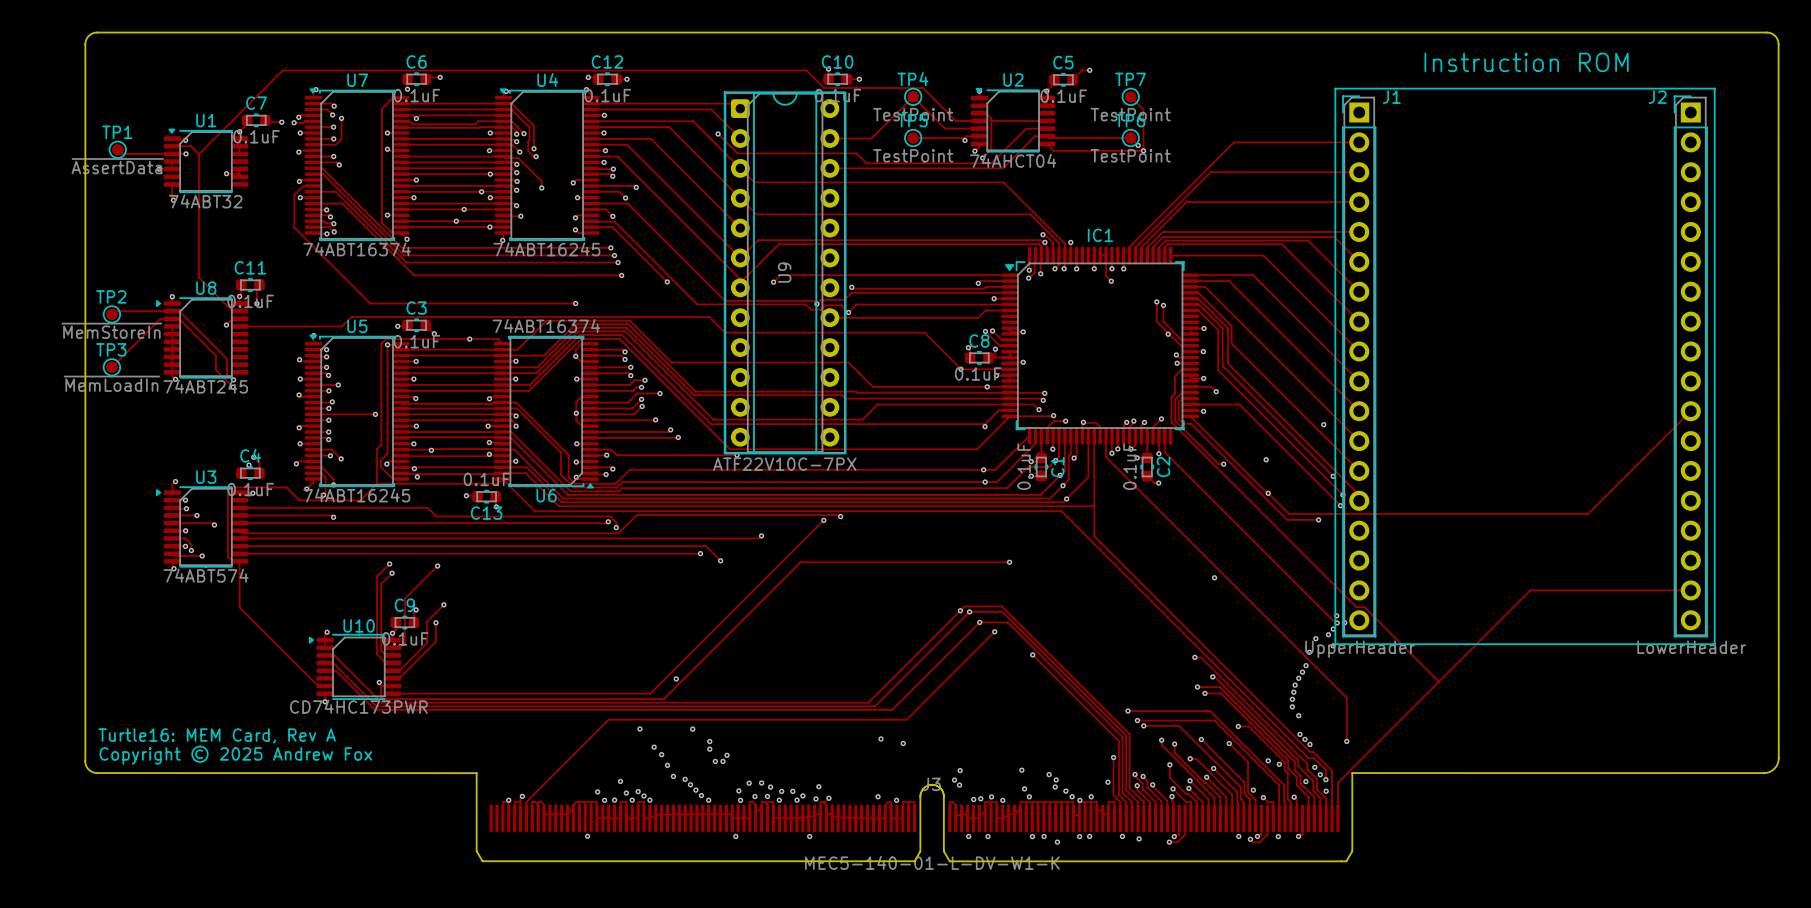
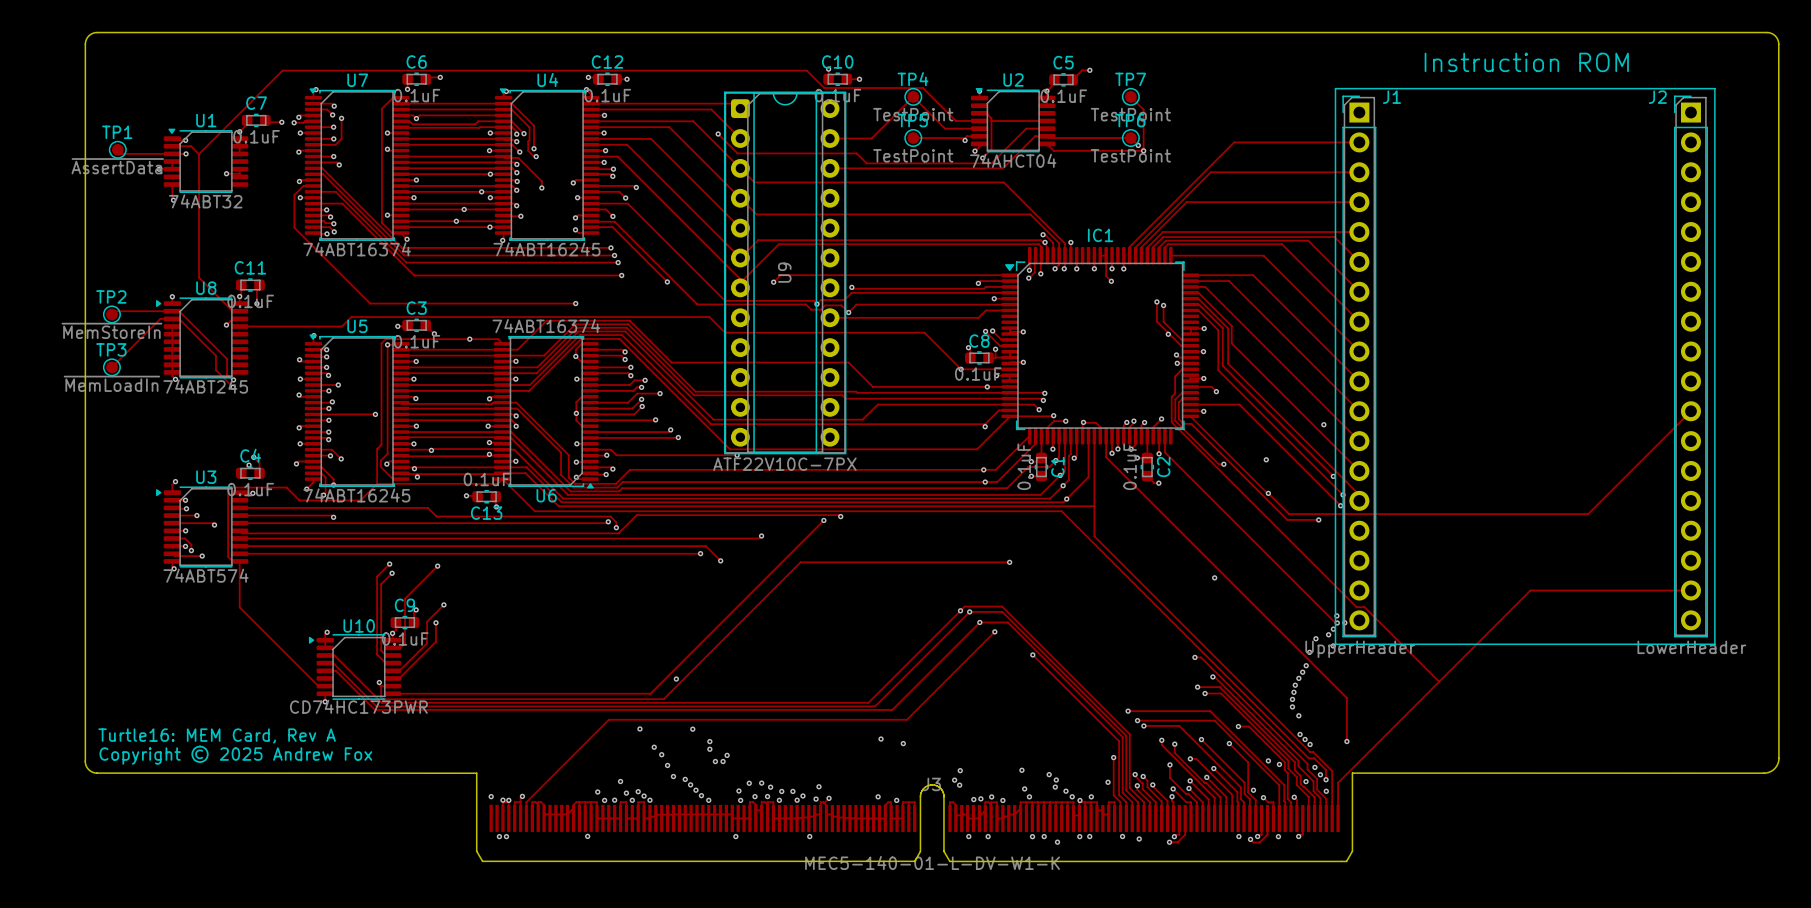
via: none -> (491, 796)
via: none -> (502, 800)
via: none -> (499, 836)
via: none -> (506, 836)

